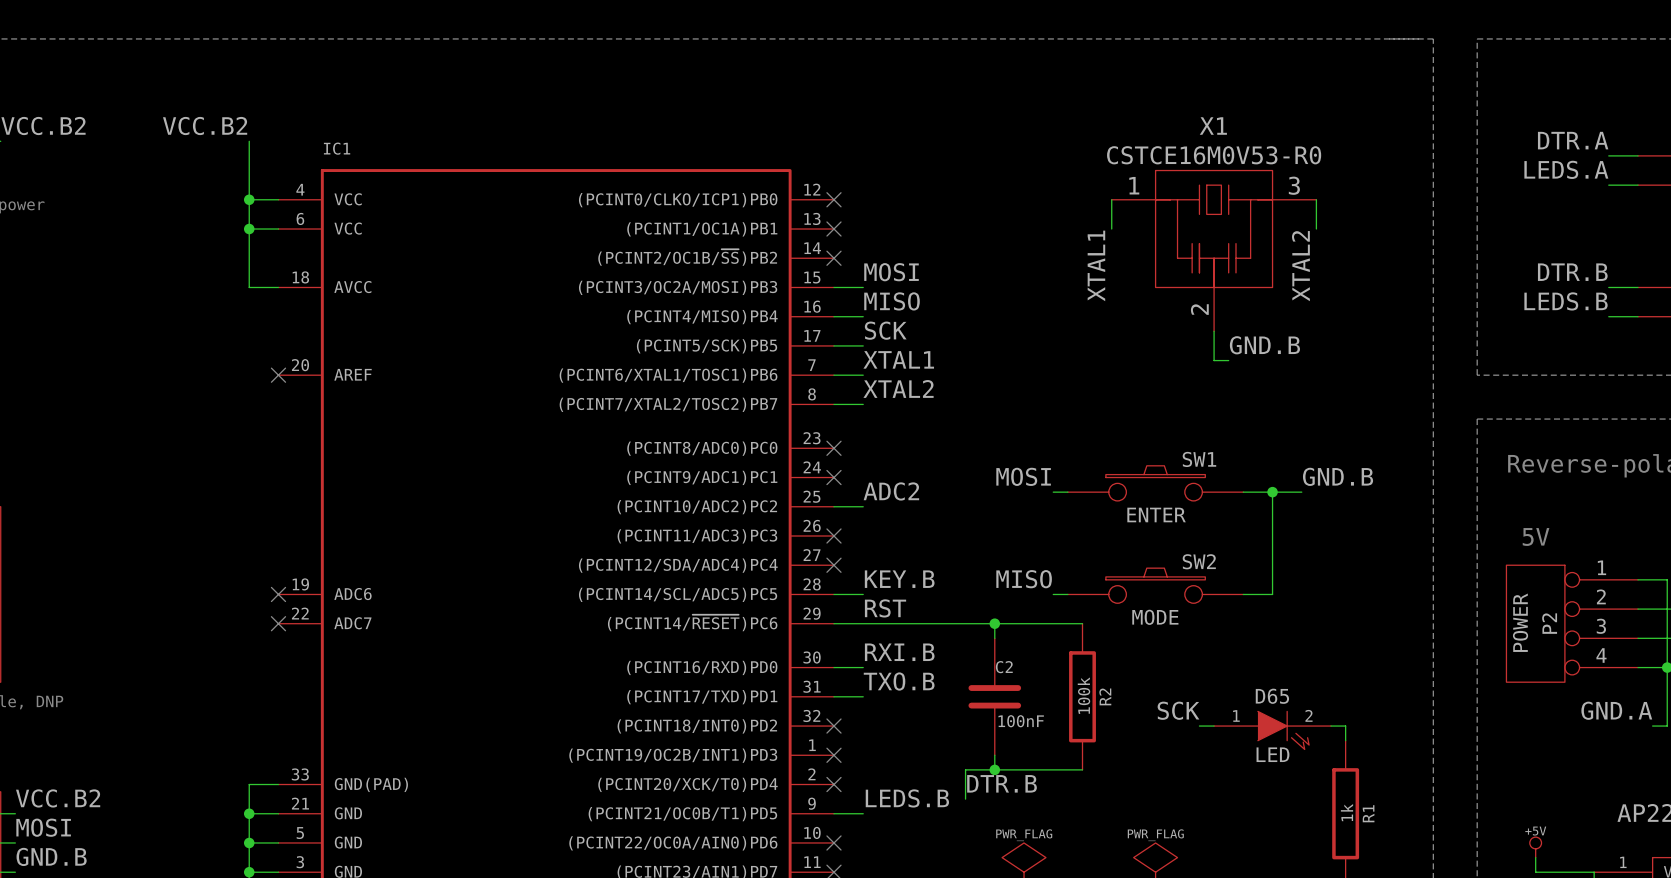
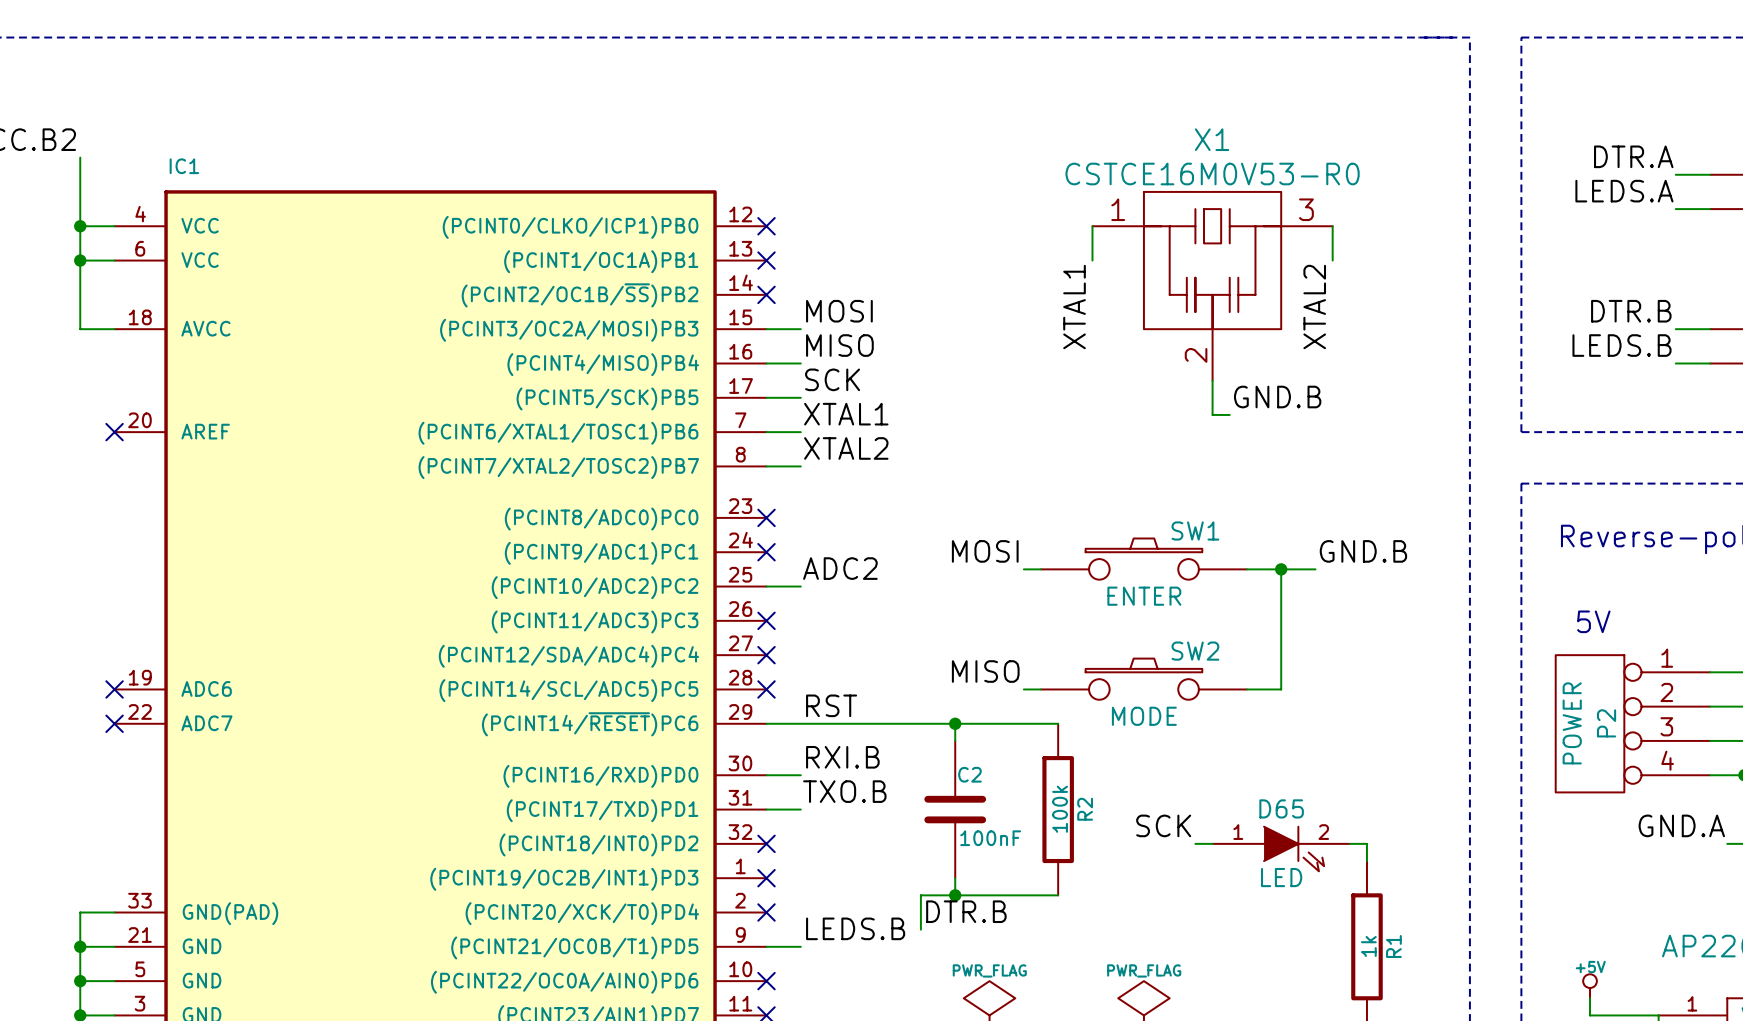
label: KEY.B (899, 579) -> none
wire: (833, 594) (863, 594) -> none
no-connect mark: none -> (766, 689)

